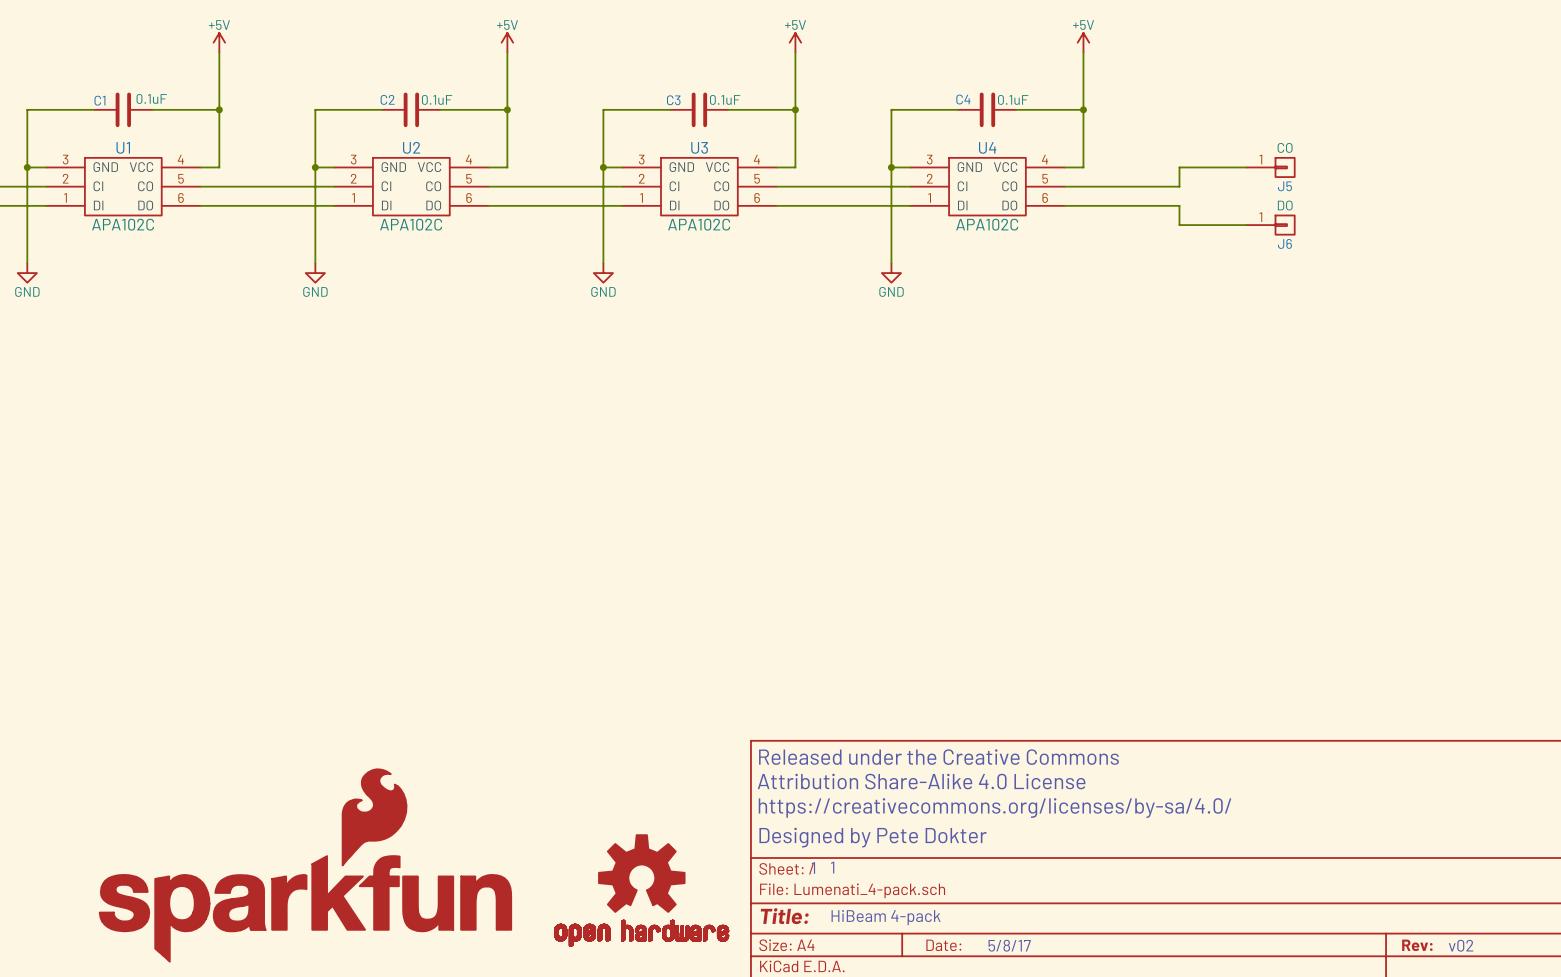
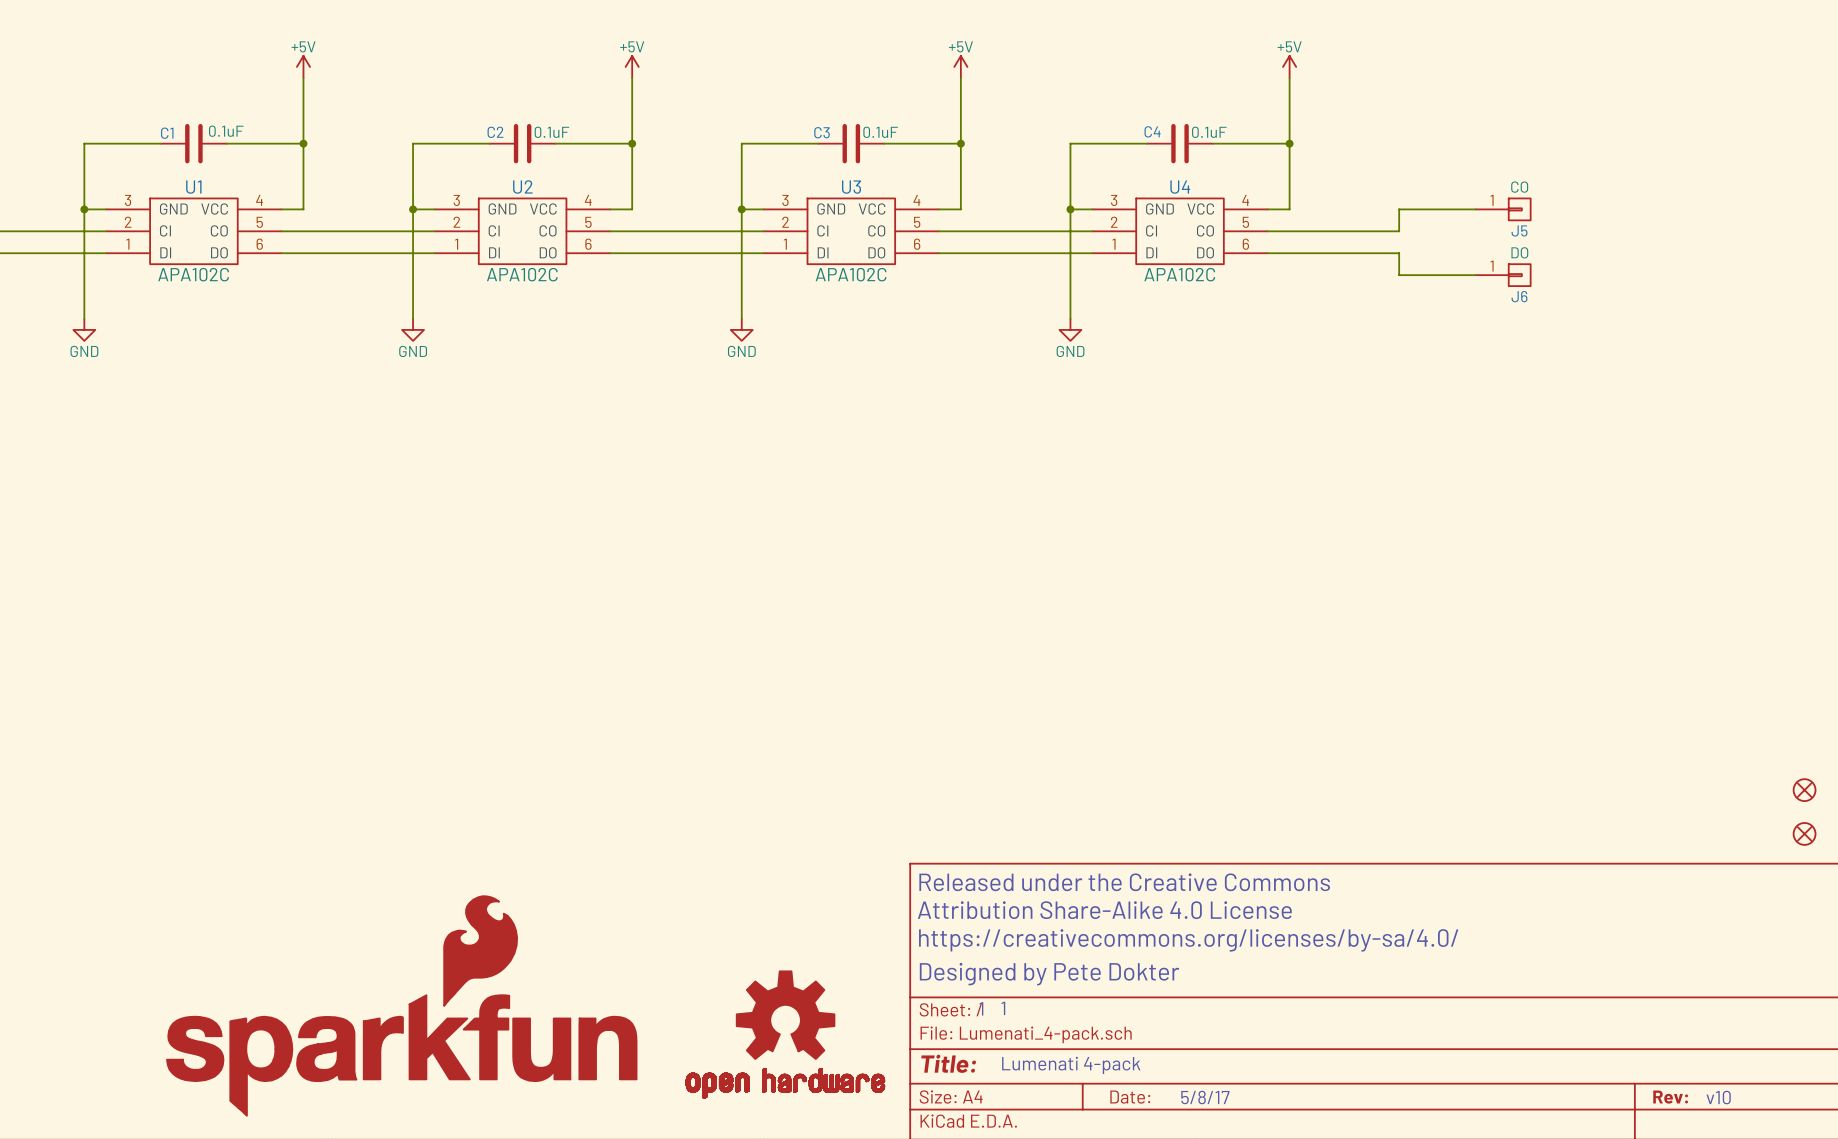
part: none -> (1804, 790)
part: none -> (1804, 833)
text: HiBeam 4-pack (886, 917) -> Lumenati 4-pack (1071, 1065)
text: v02 (1461, 945) -> v10 (1718, 1097)

